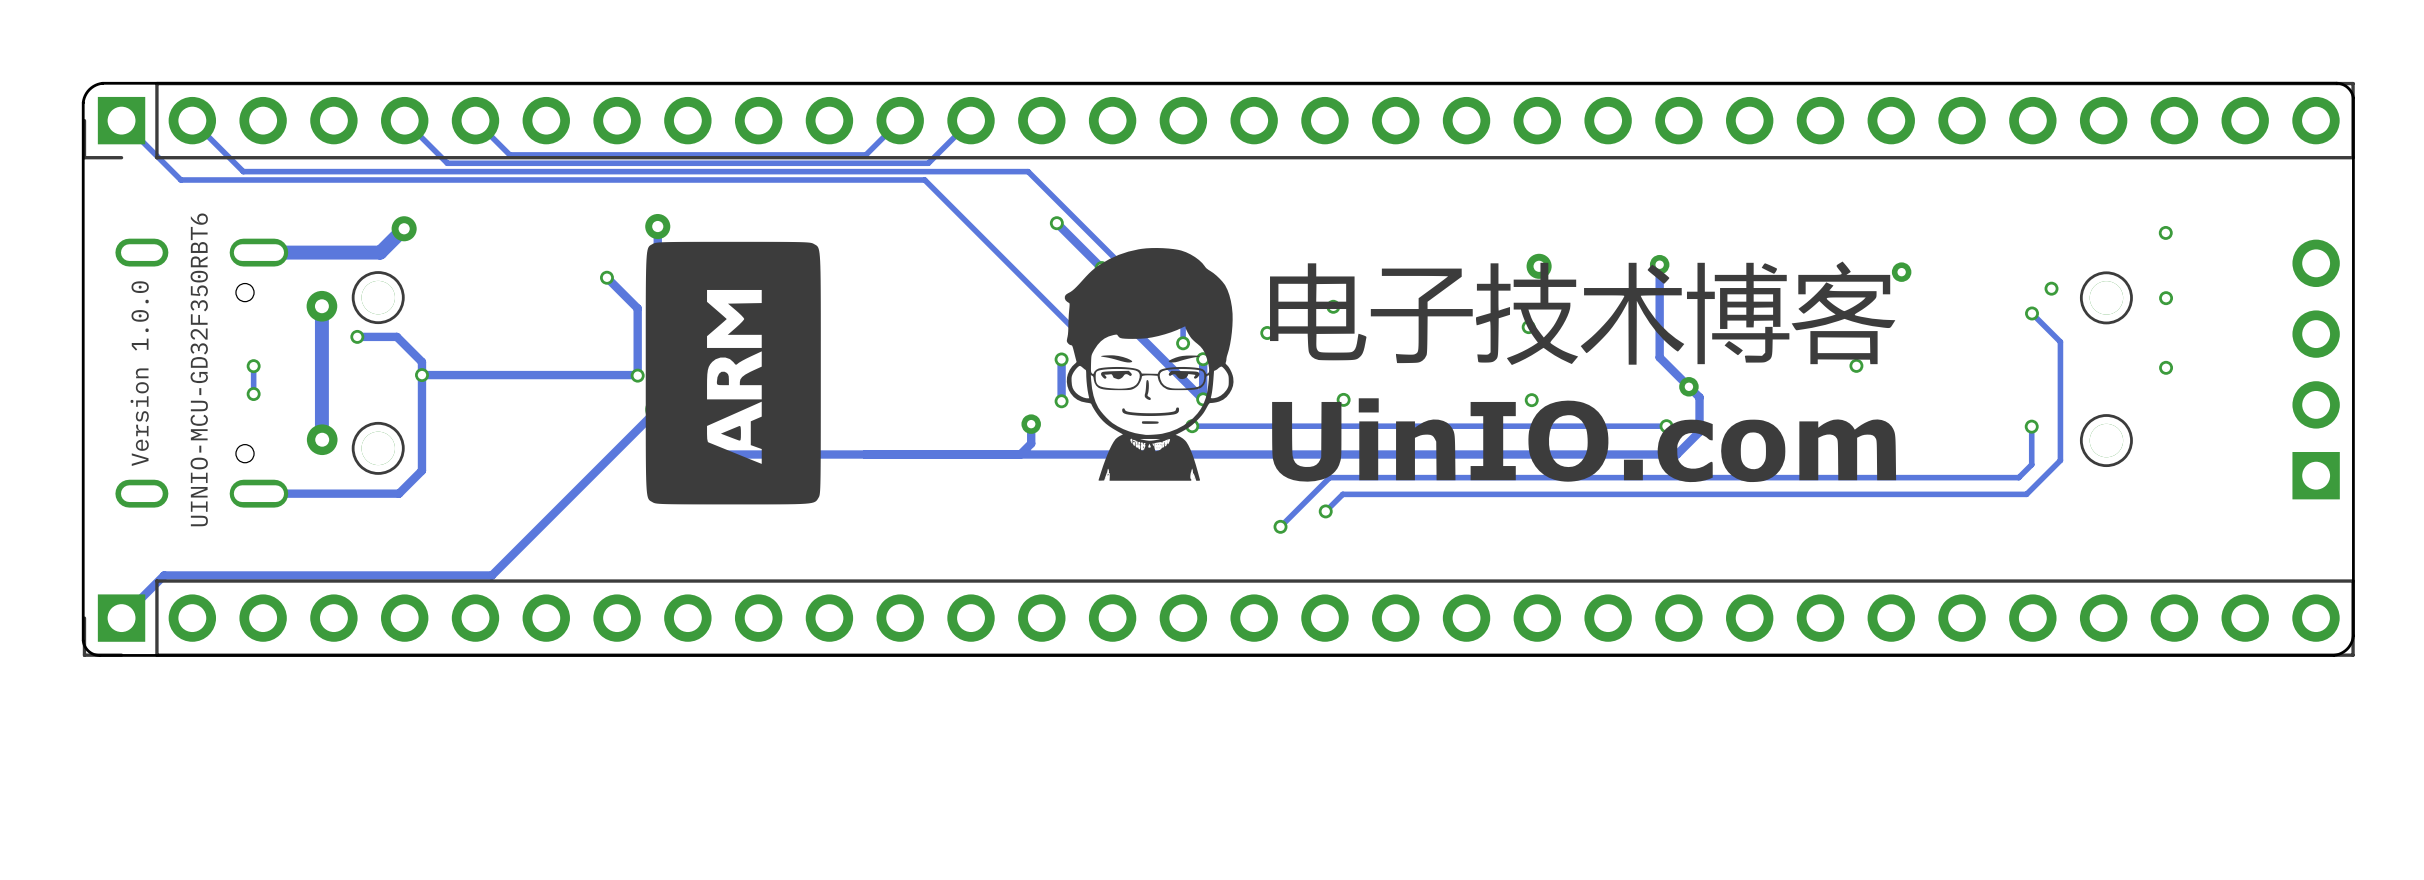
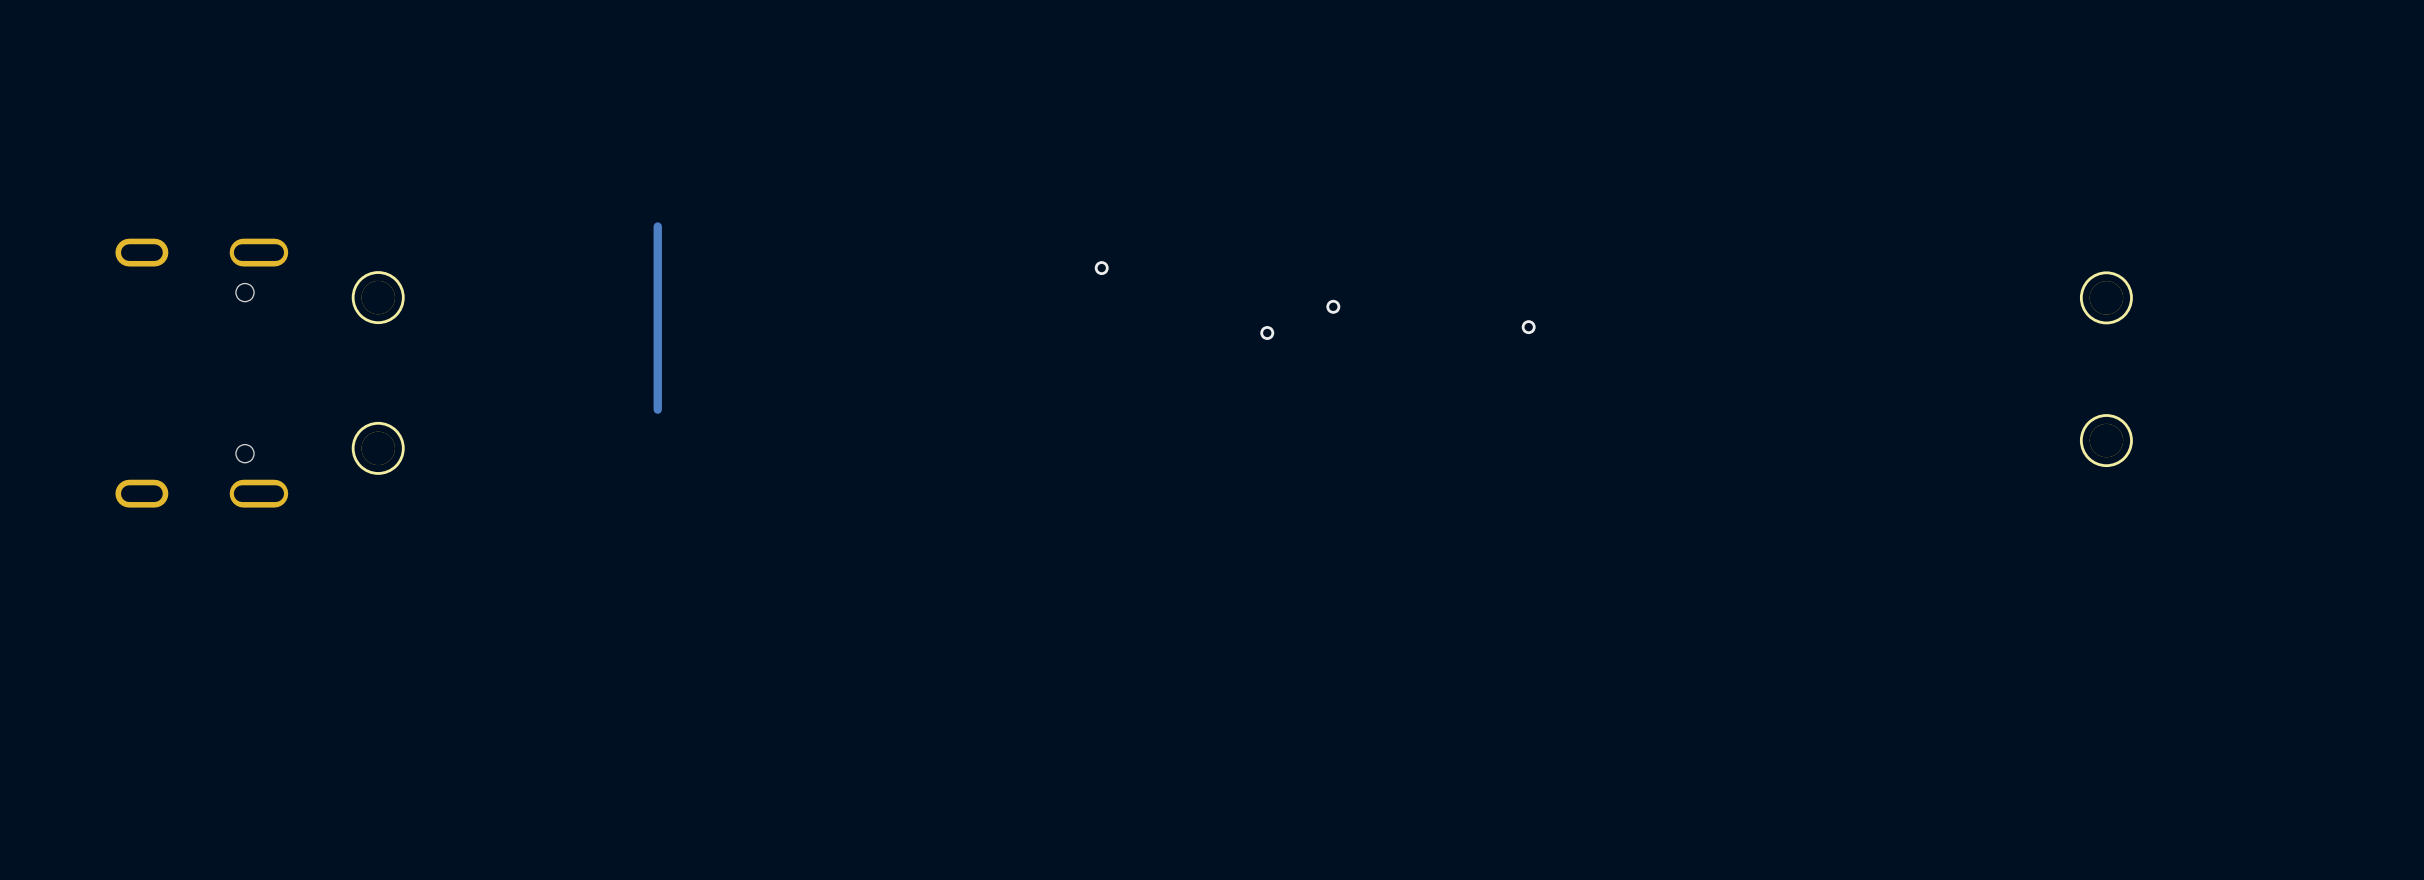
board edge: (2336, 83) (100, 83) (89, 89) (83, 102) (83, 642) (88, 651) (99, 655) (2336, 654) (2348, 647) (2353, 635) (2353, 97) (2347, 87) (2336, 83) -> none
track: (121, 120) (180, 179) (924, 179) (1079, 335) -> none
track: (192, 120) (243, 171) (1028, 171) (1183, 326) (1183, 343) -> none
track: (900, 120) (865, 154) (509, 154) (475, 120) -> none
track: (971, 120) (928, 163) (447, 163) (404, 120) -> none
part: (1218, 120) -> none
track: (1056, 223) (1101, 268) (1101, 298) (1202, 399) -> none
via: (1056, 223) -> none
via: (657, 226) -> none
track: (404, 228) (380, 252) (258, 252) -> none
via: (404, 228) -> none
via: (2165, 232) -> none
drawing: [645, 241, 821, 505] -> none
drawing: [1064, 248, 1897, 483] -> none
track: (1659, 264) (1659, 357) (1699, 397) (1699, 431) (1676, 454) (702, 454) (657, 409) (491, 575) (164, 575) (121, 618) -> none
via: (1659, 264) -> none
via: (1539, 266) -> none
via: (1901, 272) -> none
track: (606, 277) (637, 308) (637, 375) (421, 375) -> none
via: (606, 277) -> none
via: (2051, 288) -> none
via: (2166, 298) -> none
track: (321, 306) (321, 439) -> none
via: (321, 306) -> none
track: (2032, 313) (2060, 341) (2060, 460) (2026, 494) (1342, 494) (1325, 511) -> none
via: (2032, 313) -> none
track: (357, 336) (396, 336) (421, 361) (421, 470) (398, 493) (258, 493) -> none
via: (357, 336) -> none
via: (1183, 343) -> none
track: (1061, 359) (1061, 401) -> none
via: (1061, 359) -> none
track: (1203, 359) (1203, 399) -> none
via: (1203, 359) -> none
via: (1856, 365) -> none
track: (253, 366) (253, 394) -> none
via: (253, 366) -> none
via: (2166, 367) -> none
text: UINIO-MCU-GD32F350RBT6 (199, 369) -> none
part: (2316, 369) -> none
text: Version 1.0.0 (139, 373) -> none
via: (421, 375) -> none
via: (637, 375) -> none
via: (1688, 386) -> none
via: (253, 394) -> none
via: (1203, 399) -> none
via: (1343, 399) -> none
via: (1531, 400) -> none
via: (1061, 401) -> none
track: (1031, 424) (1031, 443) (1020, 454) -> none
via: (1031, 424) -> none
via: (1192, 426) -> none
track: (1666, 426) (1192, 426) -> none
via: (1666, 426) -> none
track: (2031, 426) (2031, 464) (2018, 477) (1329, 477) (1280, 526) -> none
via: (2031, 426) -> none
via: (322, 439) -> none
via: (1325, 511) -> none
via: (1280, 526) -> none
part: (1218, 618) -> none

